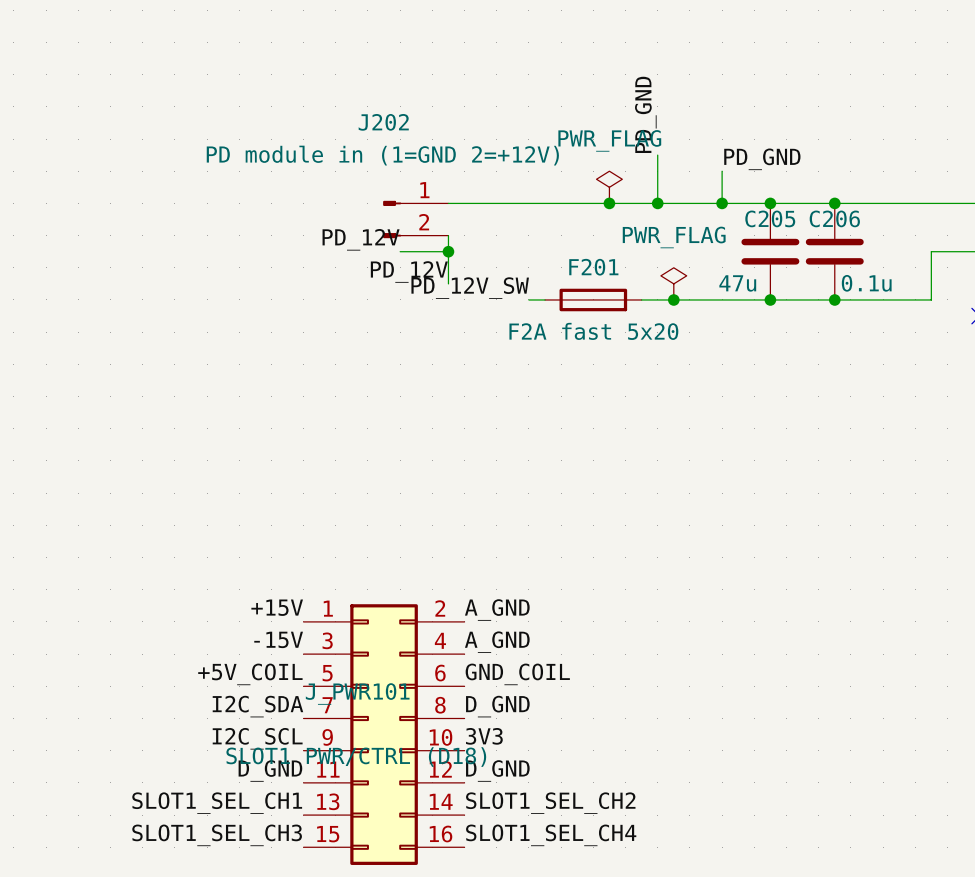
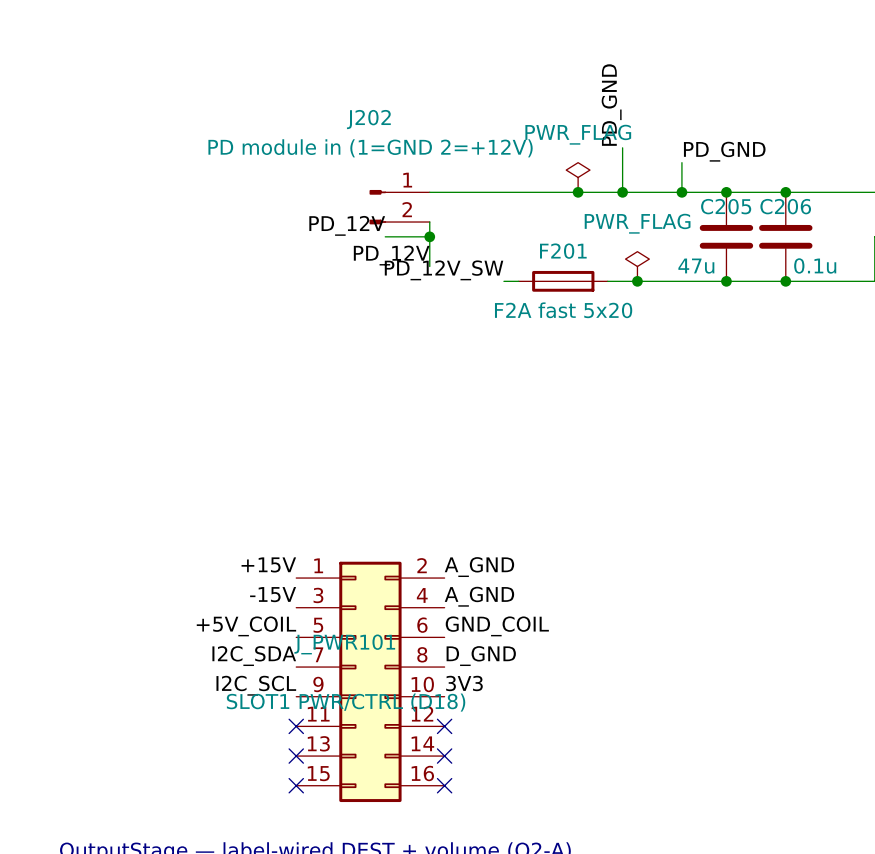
label: D_GND (270, 770) -> none
label: D_GND (497, 770) -> none
no-connect mark: none -> (296, 726)
no-connect mark: none -> (444, 726)
label: SLOT1_SEL_CH1 (217, 803) -> none
label: SLOT1_SEL_CH2 (550, 803) -> none
no-connect mark: none -> (296, 756)
no-connect mark: none -> (444, 756)
label: SLOT1_SEL_CH3 (217, 835) -> none
label: SLOT1_SEL_CH4 (551, 835) -> none
no-connect mark: none -> (296, 785)
no-connect mark: none -> (444, 785)

